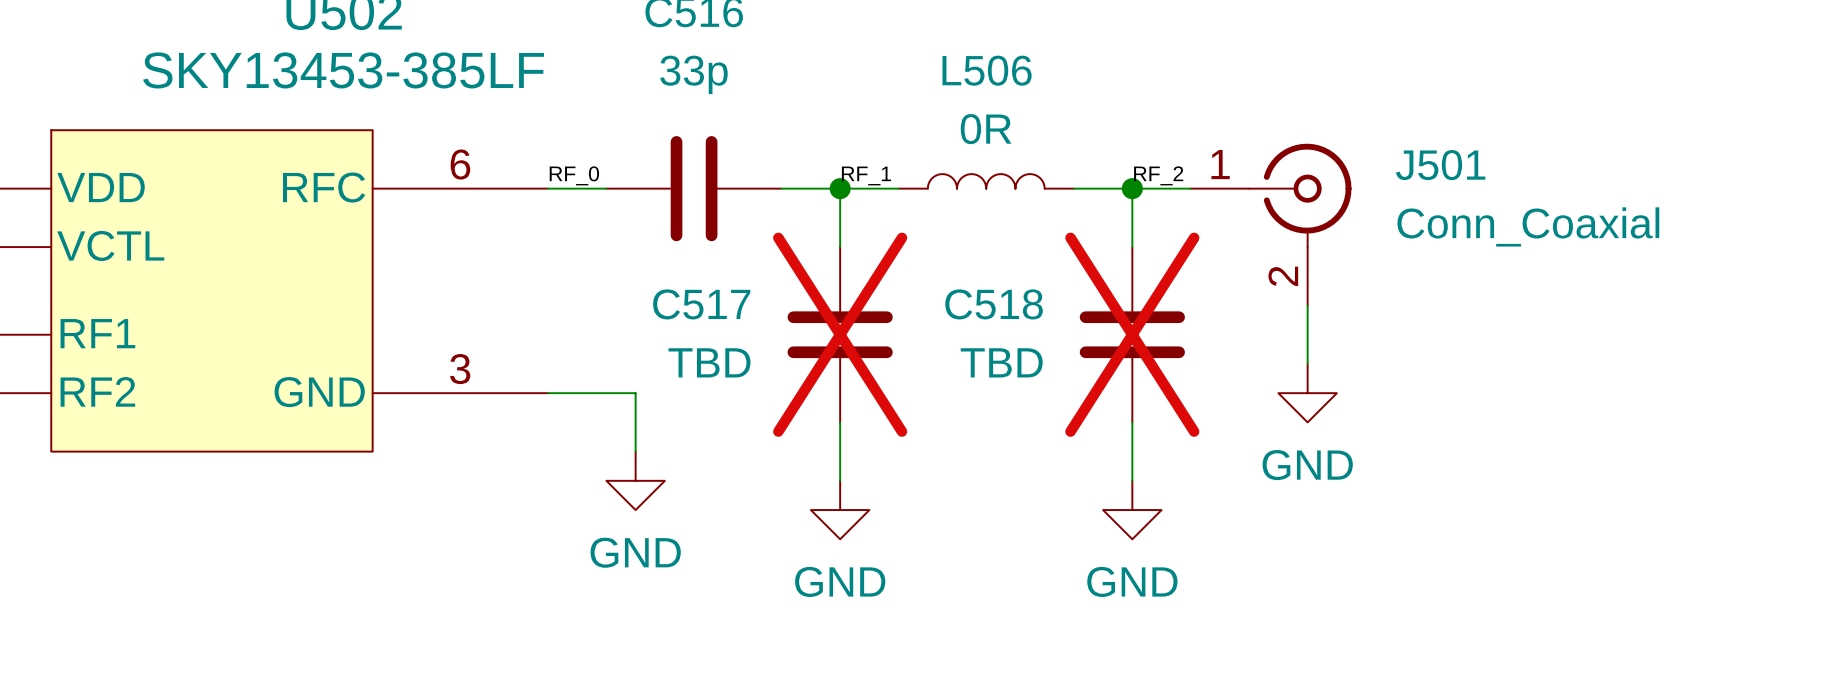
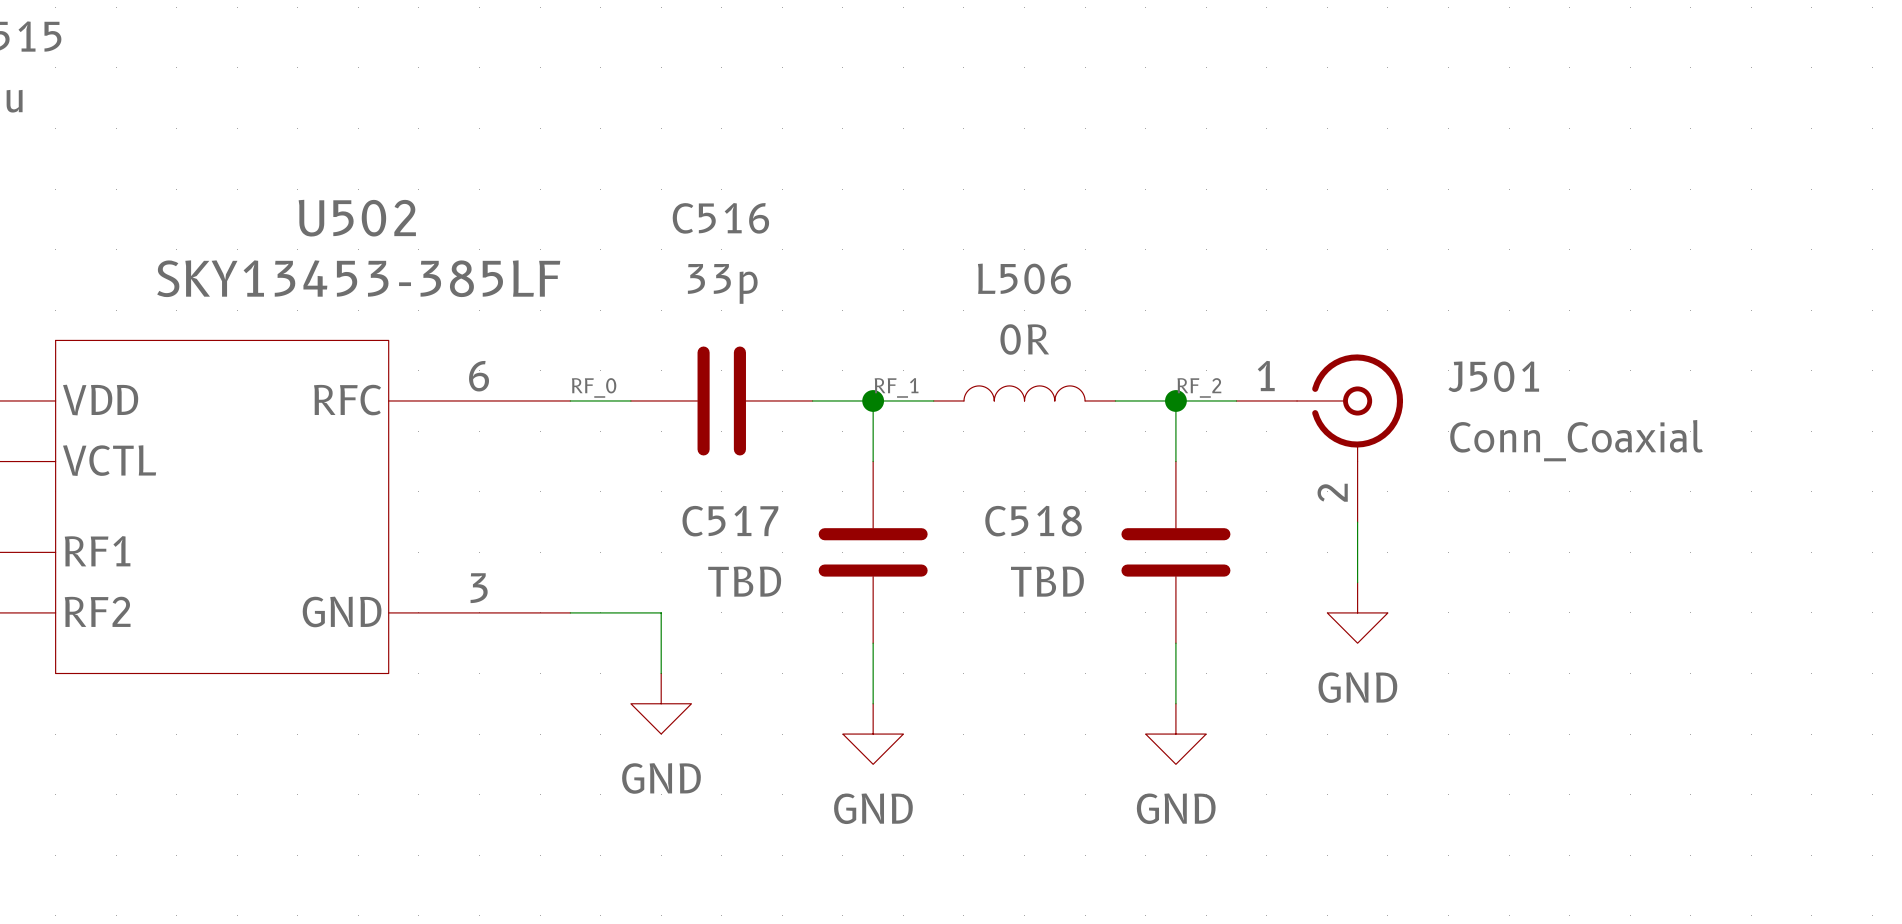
C517 do-not-place cross: (840, 334) -> none
C518 do-not-place cross: (1132, 334) -> none

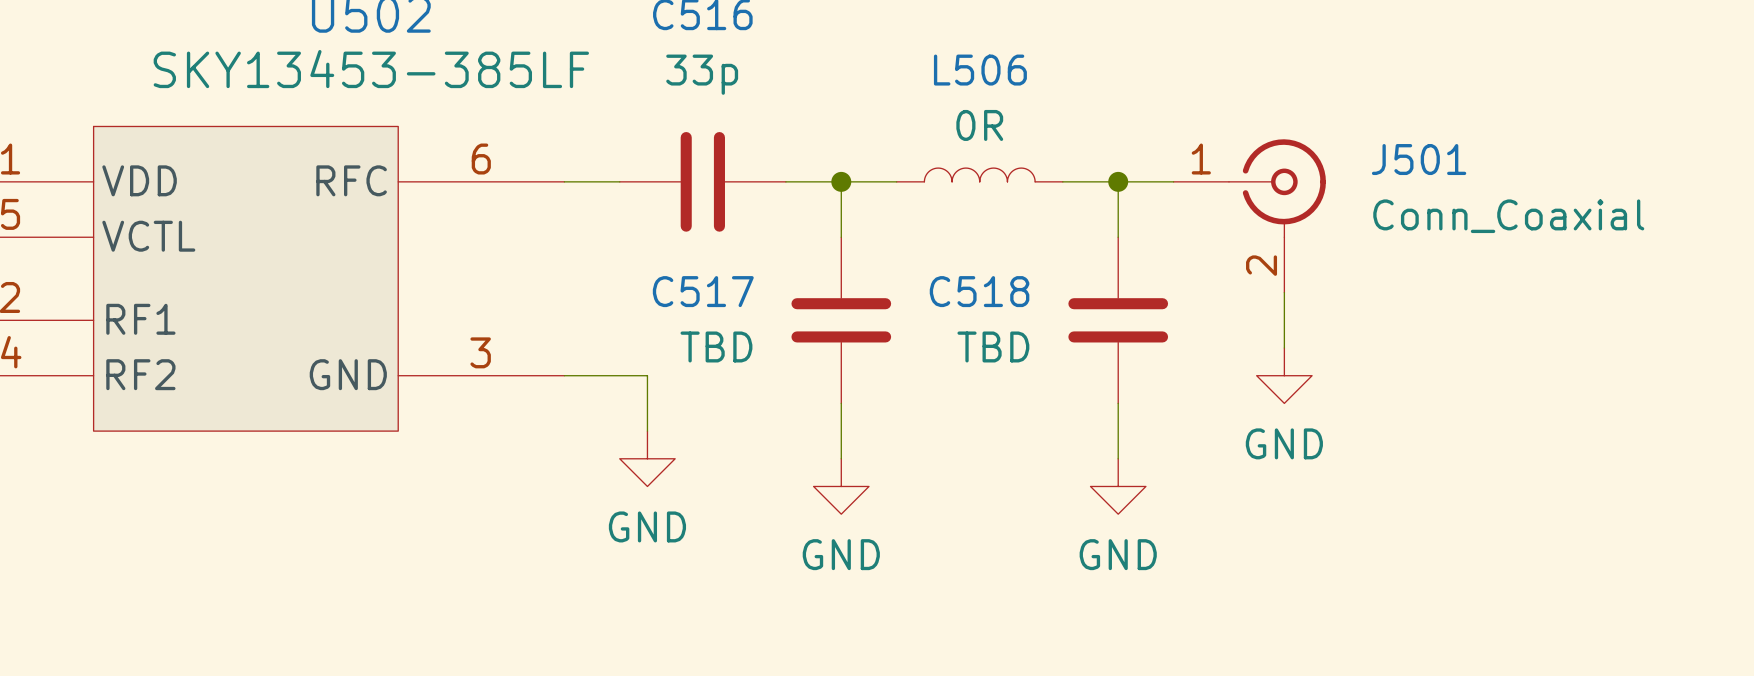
label: RF_0 (594, 387) -> none
label: RF_1 (896, 387) -> none
label: RF_2 (1199, 387) -> none

